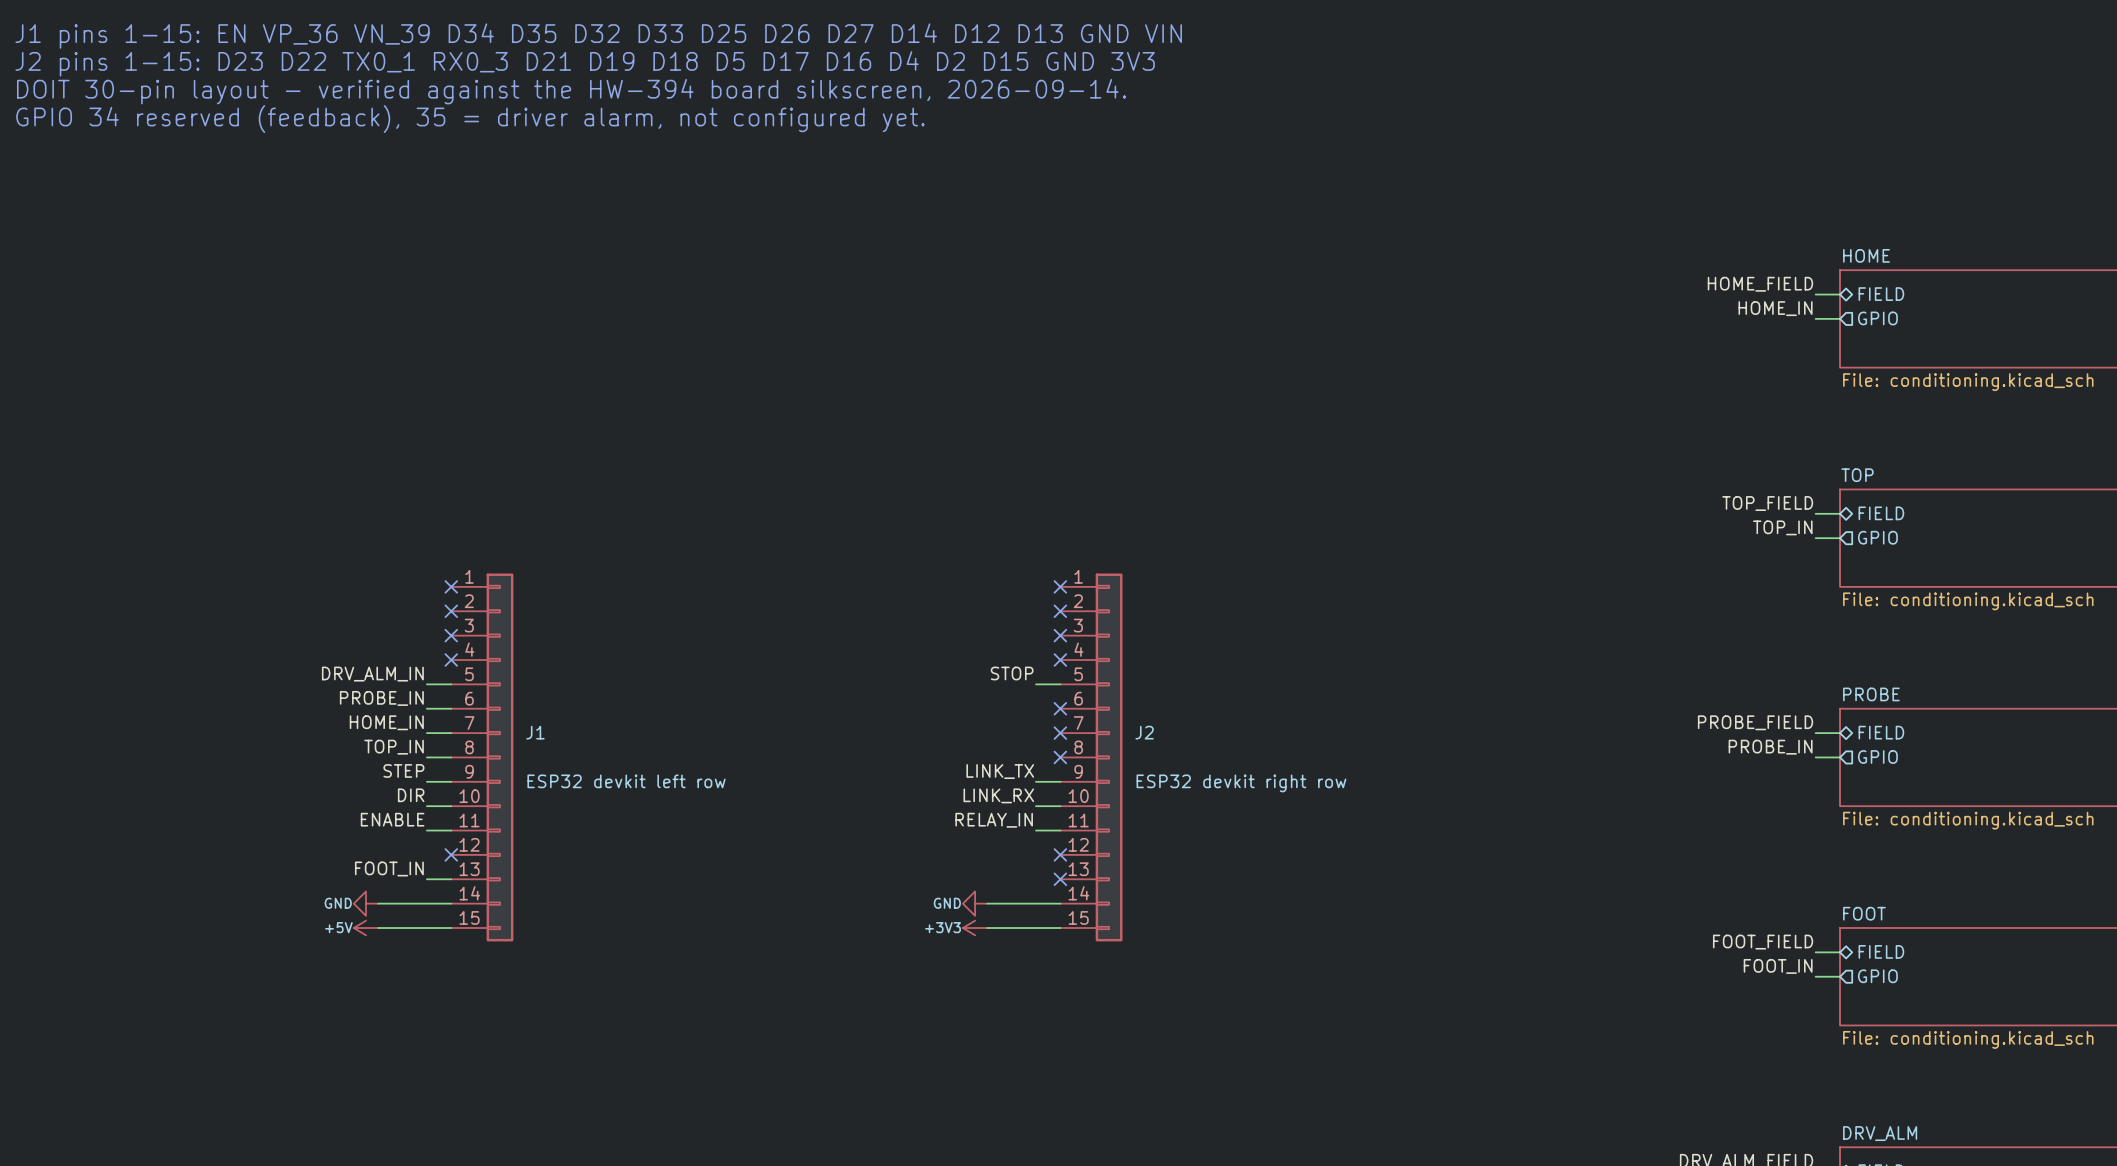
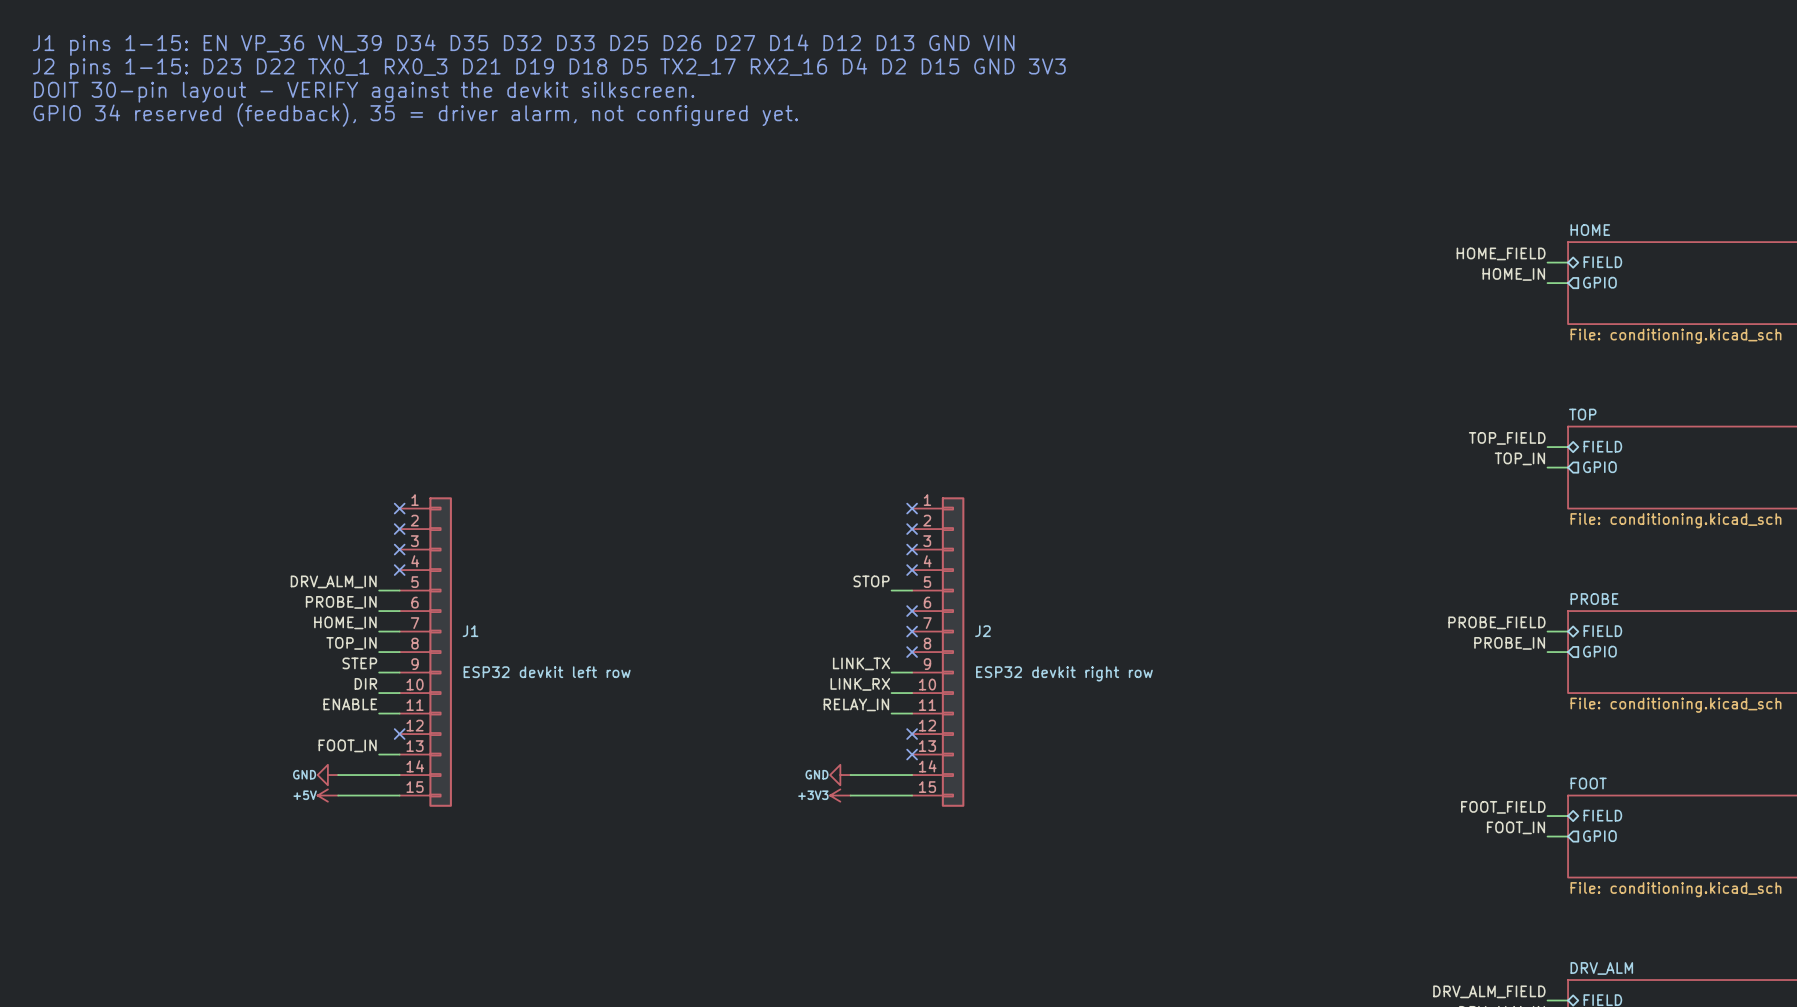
text: J2 pins 1-15: D23 D22 TX0_1 RX0_3 D21 D19 D18 D5 D17 D16 D4 D2 D15 GND 3V3 (585, 63) -> J2 pins 1-15: D23 D22 TX0_1 RX0_3 D21 D19 D18 D5 TX2_17 RX2_16 D4 D2 D15 GND 3V3 (549, 68)
text: DOIT 30-pin layout - verified against the HW-394 board silkscreen, 2026-09-14. (571, 91) -> DOIT 30-pin layout - VERIFY against the devkit silkscreen. (364, 92)

